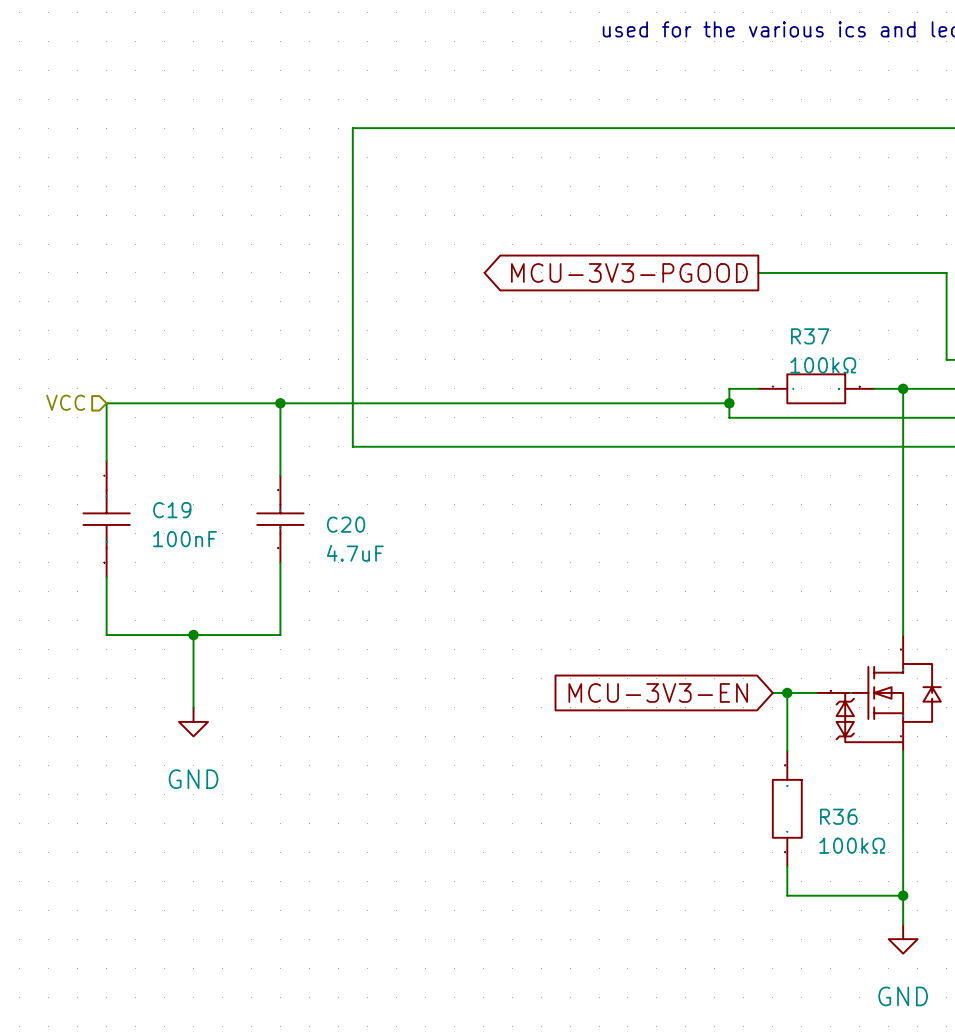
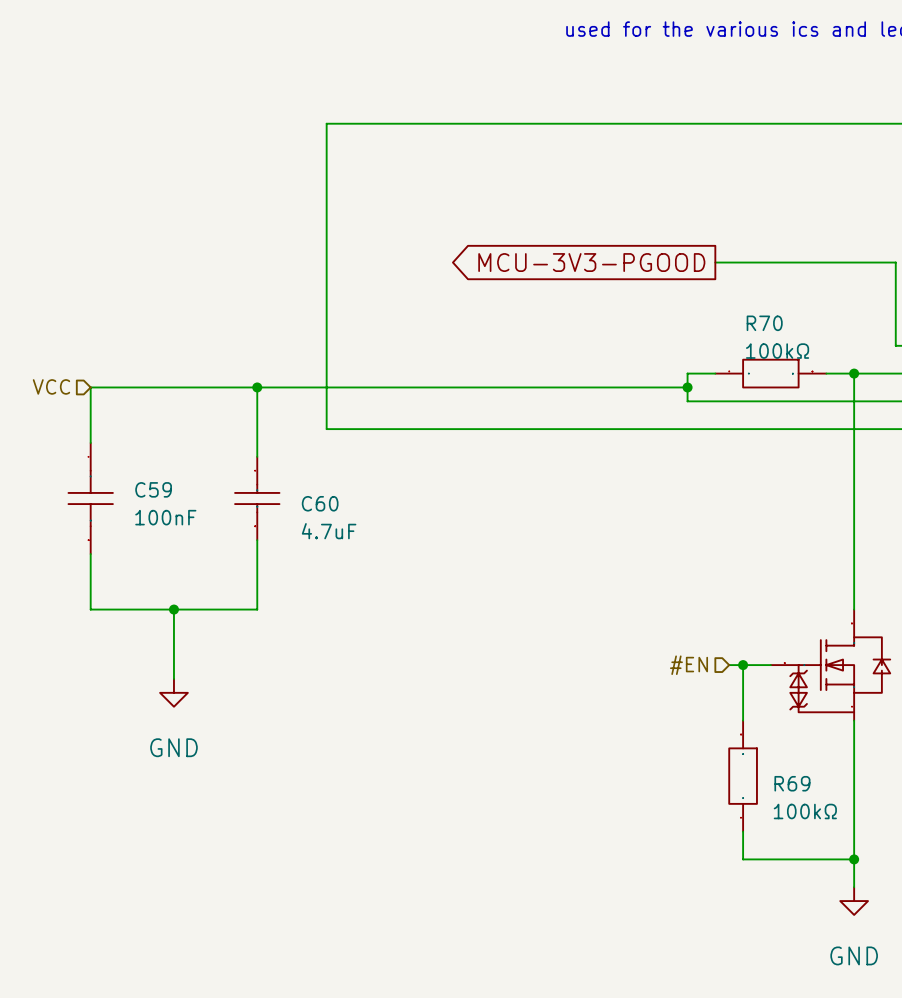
R37 name: R37 (810, 336) -> R70 (764, 323)
C19 name: C19 (172, 510) -> C59 (153, 489)
C20 name: C20 (346, 524) -> C60 (320, 503)
global label: MCU-3V3-EN (658, 692) -> none
hierarchical label: none -> #EN (689, 665)
R36 name: R36 (838, 816) -> R69 (792, 783)

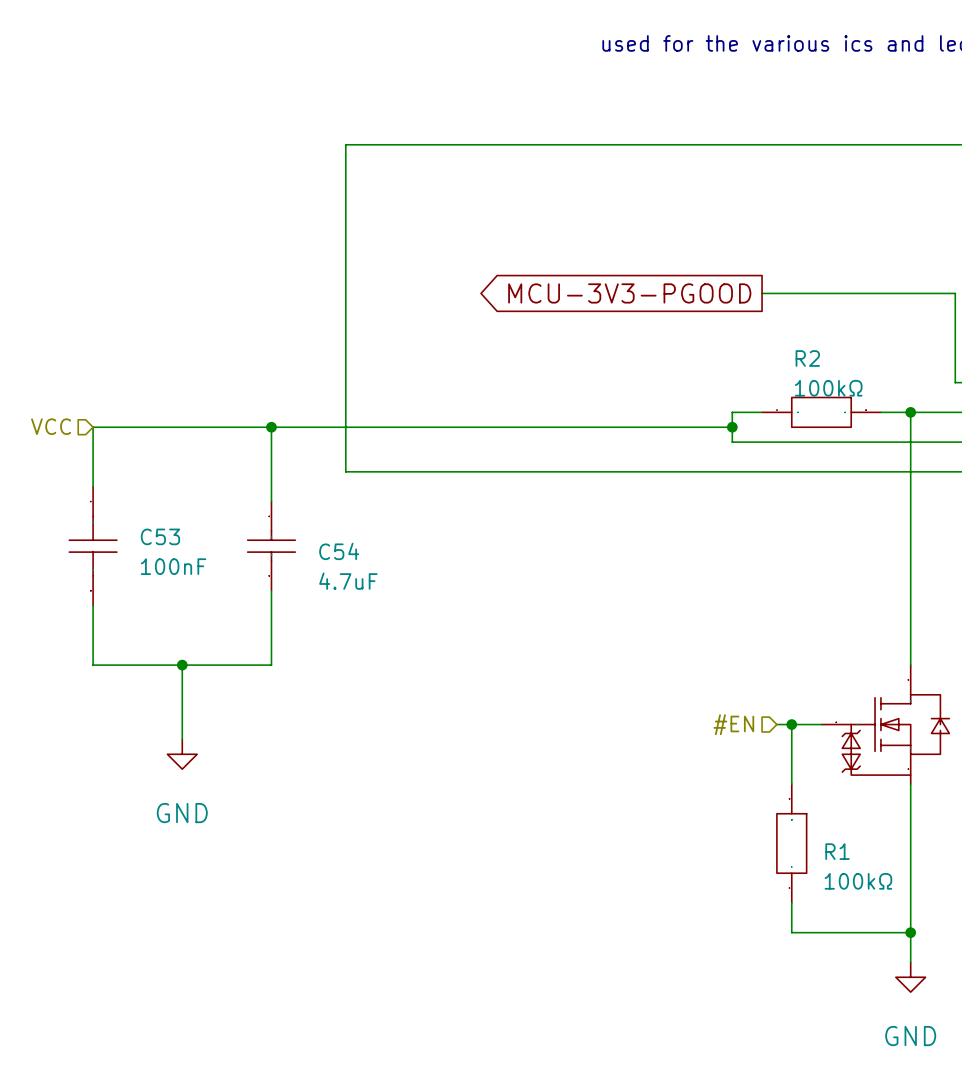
R70 name: R70 (764, 323) -> R2 (807, 358)
C59 name: C59 (153, 489) -> C53 (160, 536)
C60 name: C60 (320, 503) -> C54 (339, 551)
R69 name: R69 (792, 783) -> R1 (837, 851)

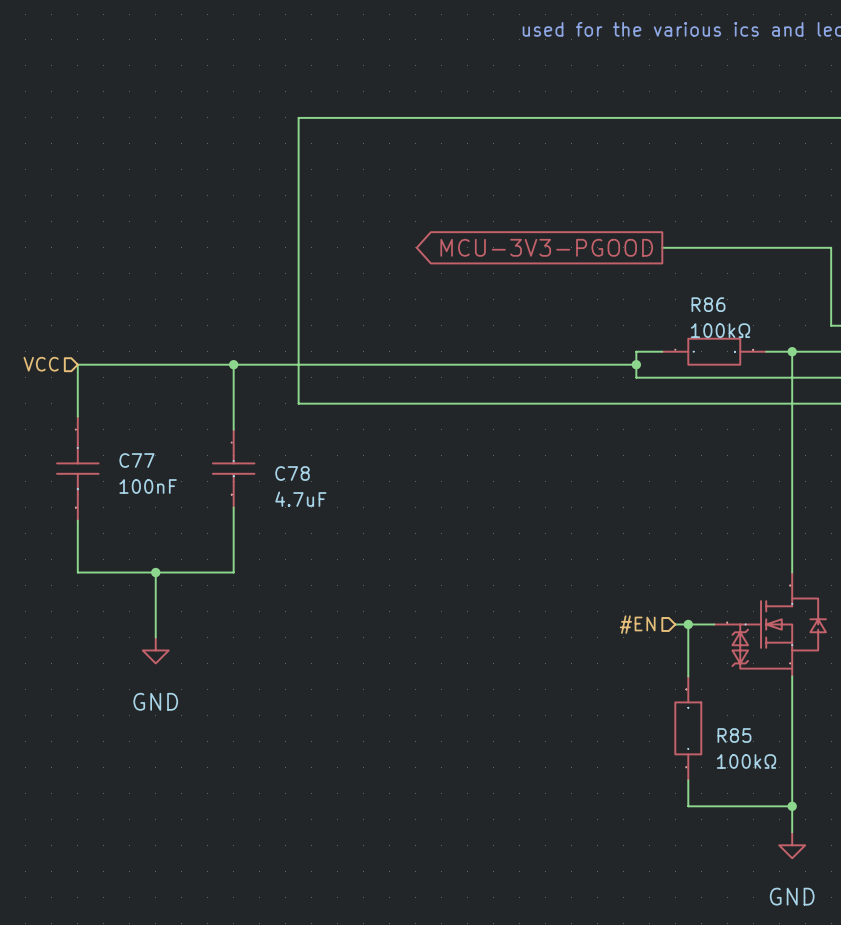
R2 name: R2 (807, 358) -> R86 (708, 304)
C53 name: C53 (160, 536) -> C77 (136, 460)
C54 name: C54 (339, 551) -> C78 (292, 473)
R1 name: R1 (837, 851) -> R85 (734, 735)

